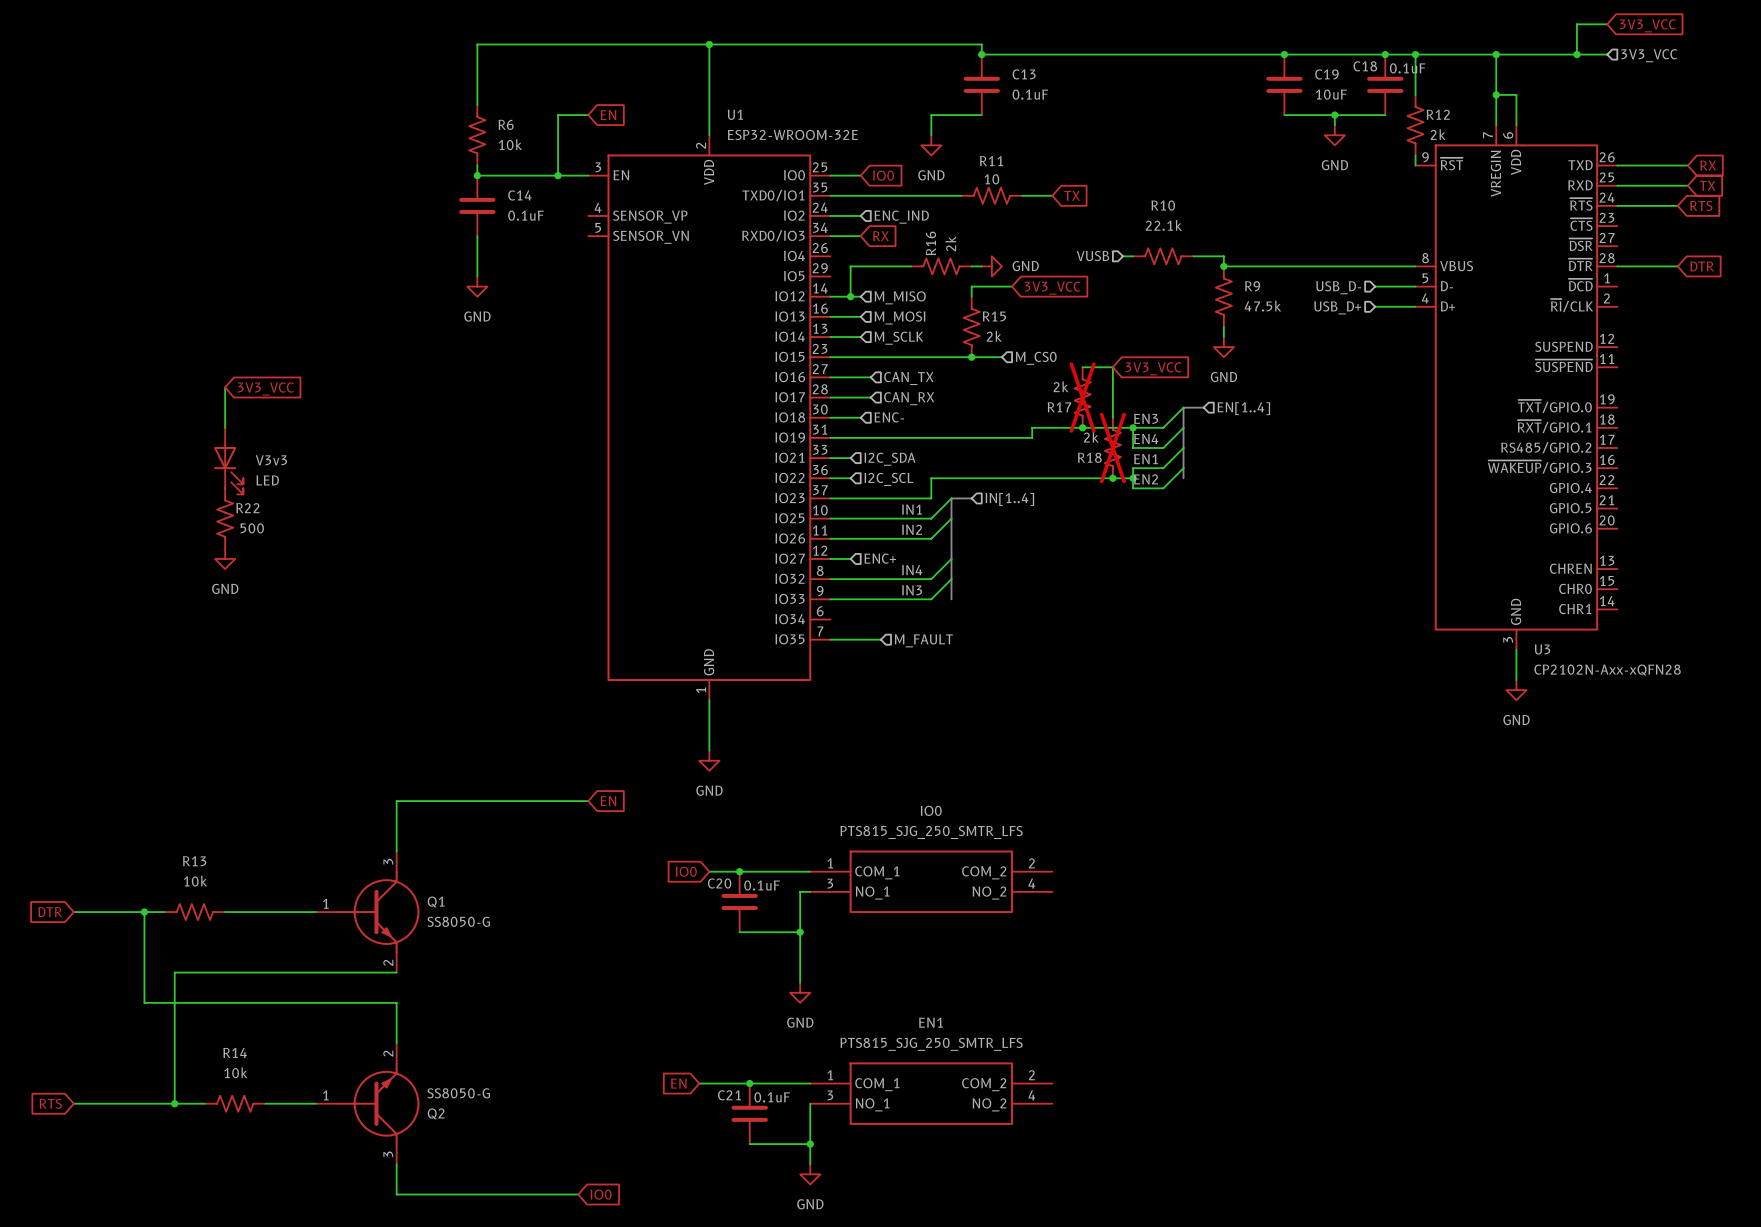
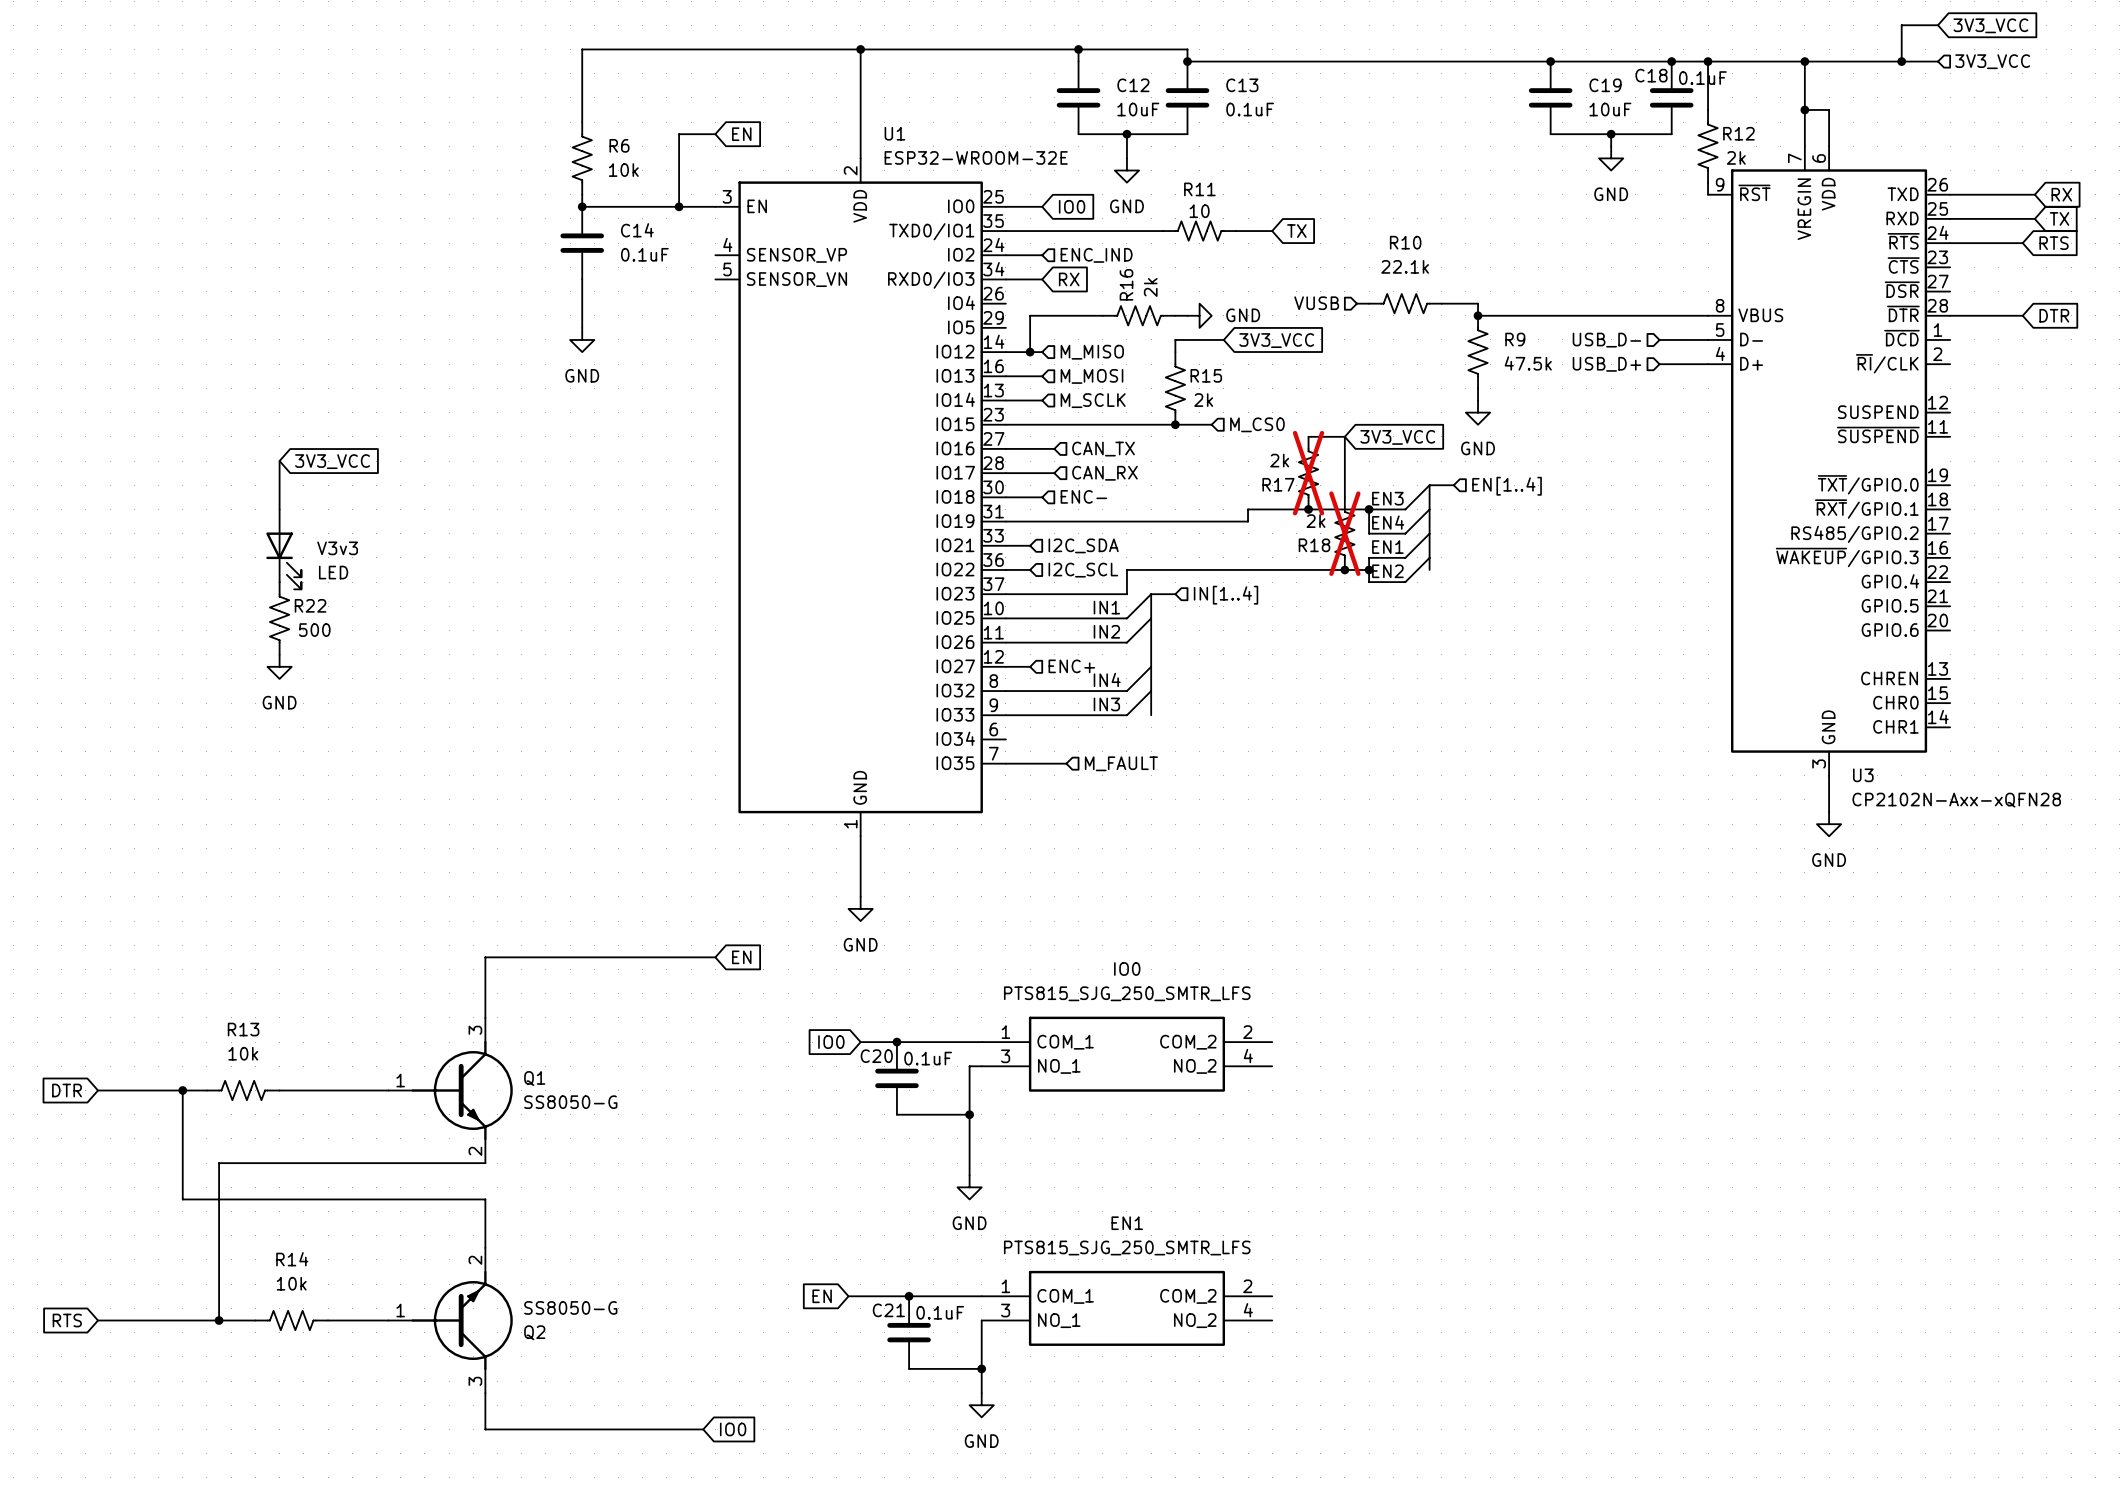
wire: none -> (1078, 49) (1078, 61)
junction: none -> (1078, 49)
C12: none -> 10uF (1078, 97)
wire: none -> (1078, 134) (1126, 134)
junction: none -> (1126, 134)

